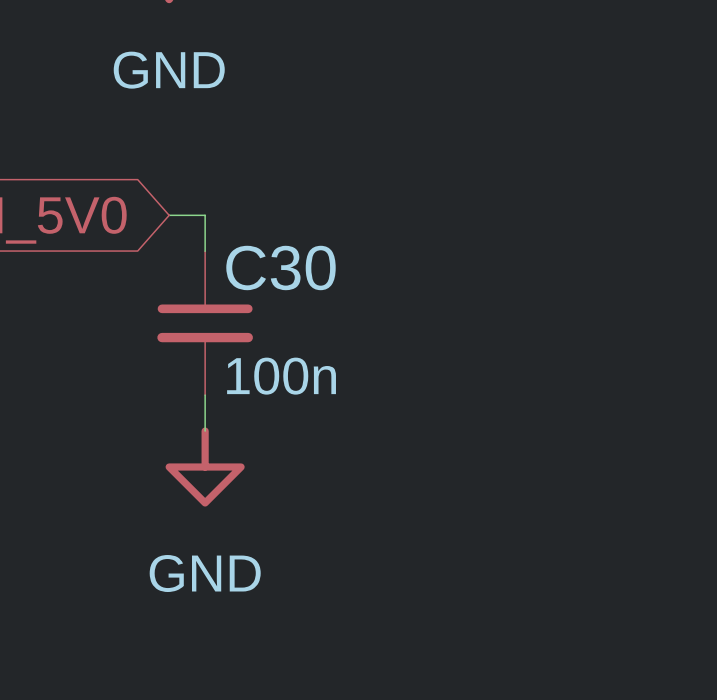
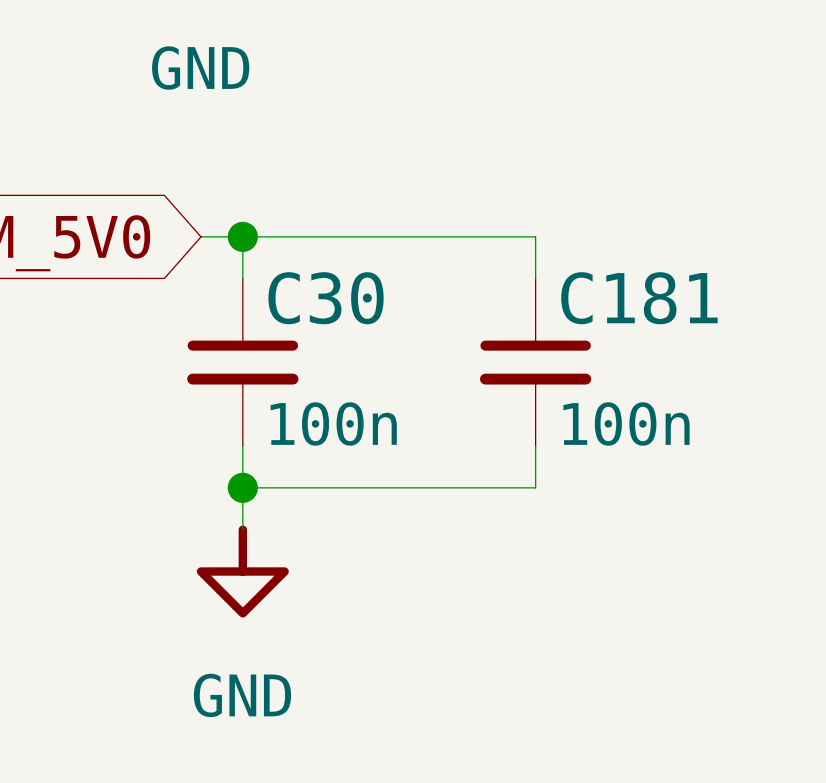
wire: none -> (242, 236) (535, 236) (535, 278)
junction: none -> (242, 236)
C181: none -> (535, 362)
wire: none -> (535, 446) (535, 487) (242, 487) (242, 529)
junction: none -> (242, 487)
power symbol position: GND (205, 467) -> GND (242, 571)

